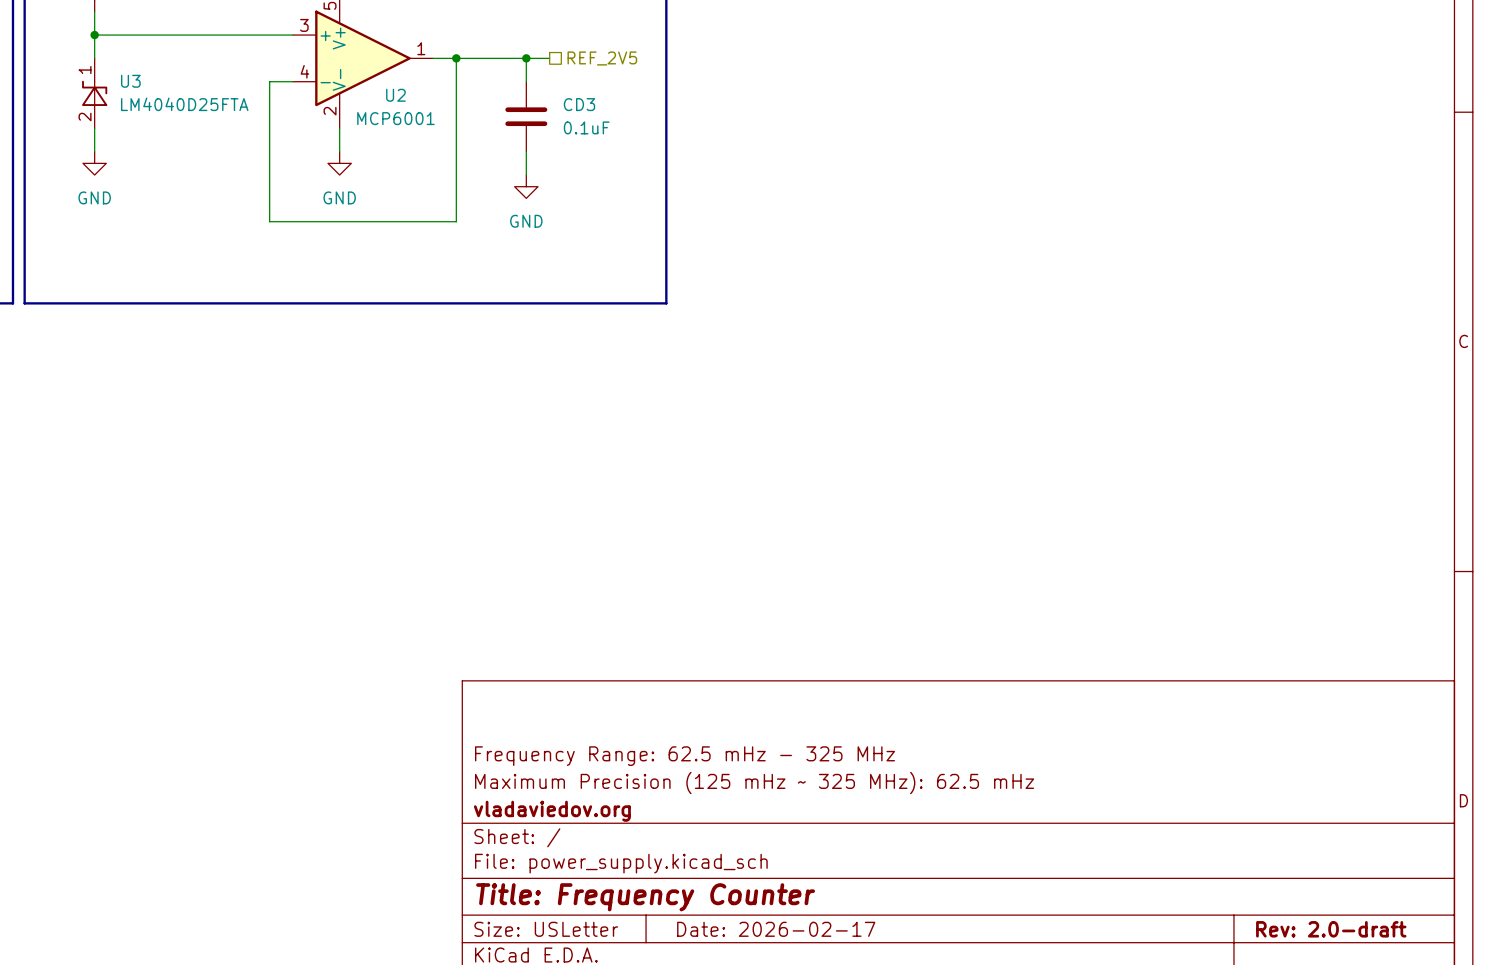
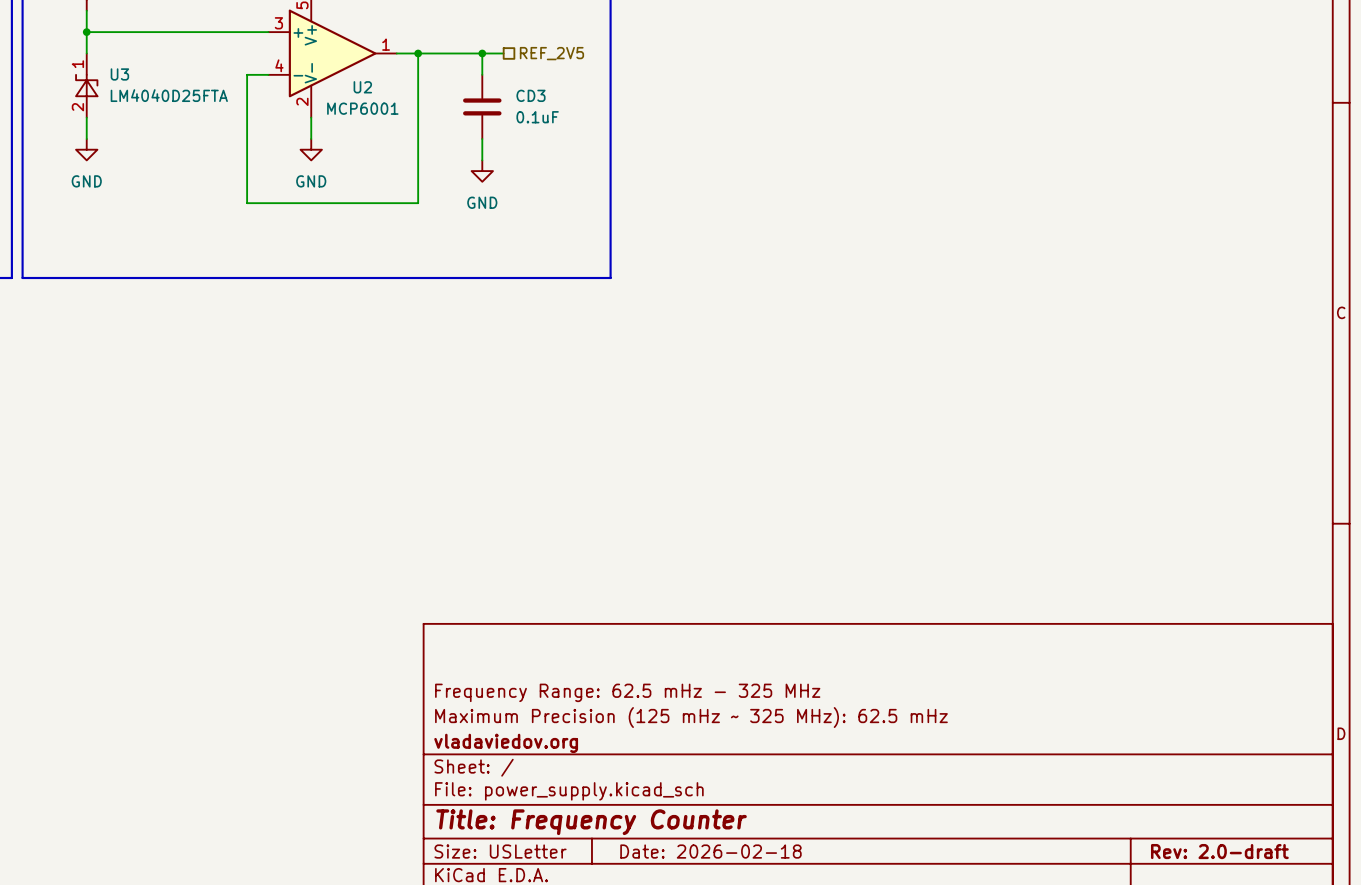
title block: Date: 2026-02-17 (776, 929) -> Date: 2026-02-18 (710, 851)

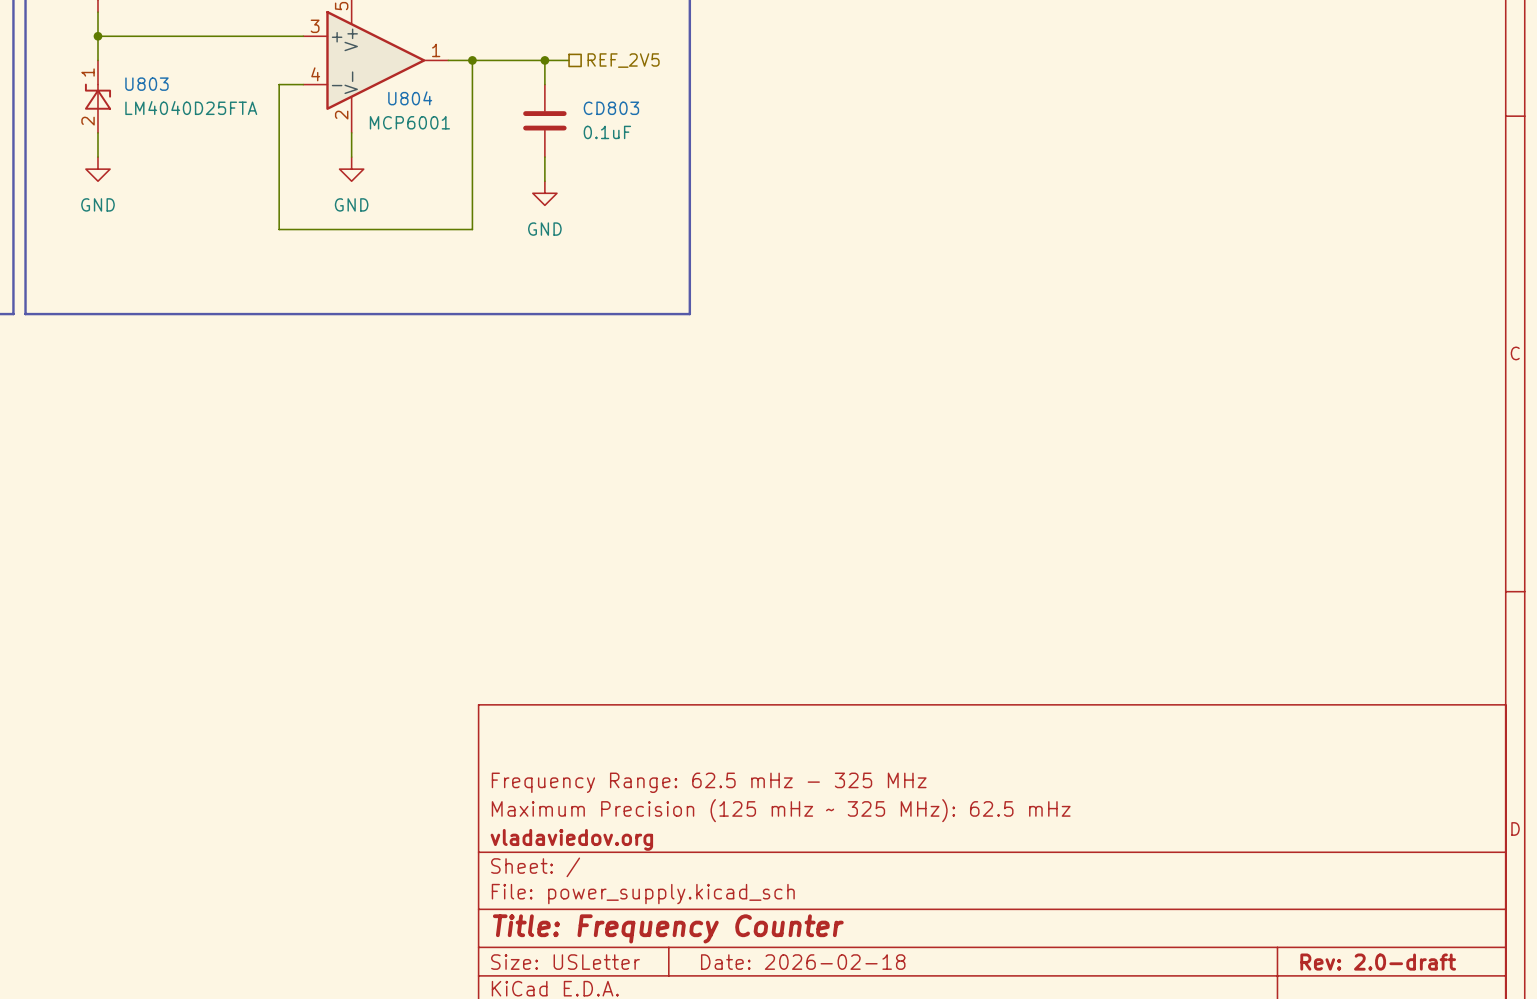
U3 name: U3 (119, 74) -> U803 (146, 84)
U2 name: U2 (362, 87) -> U804 (410, 98)
CD3 name: CD3 (530, 95) -> CD803 (611, 108)

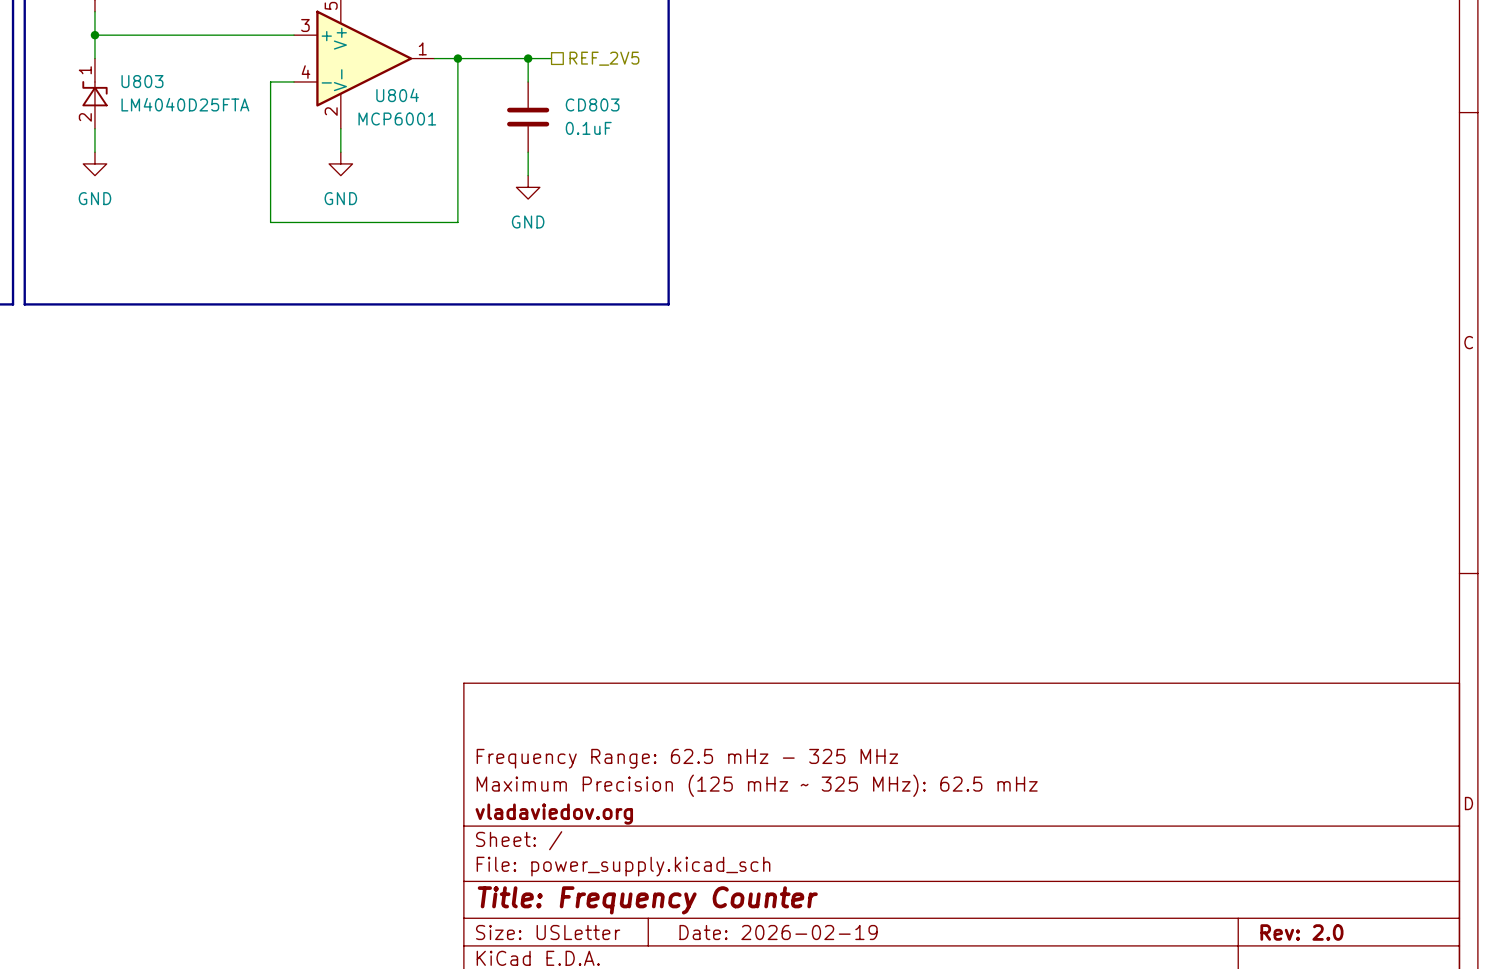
title block: Date: 2026-02-18 (803, 962) -> Date: 2026-02-19 (778, 932)
title block: Rev: 2.0-draft (1378, 962) -> Rev: 2.0 (1301, 932)

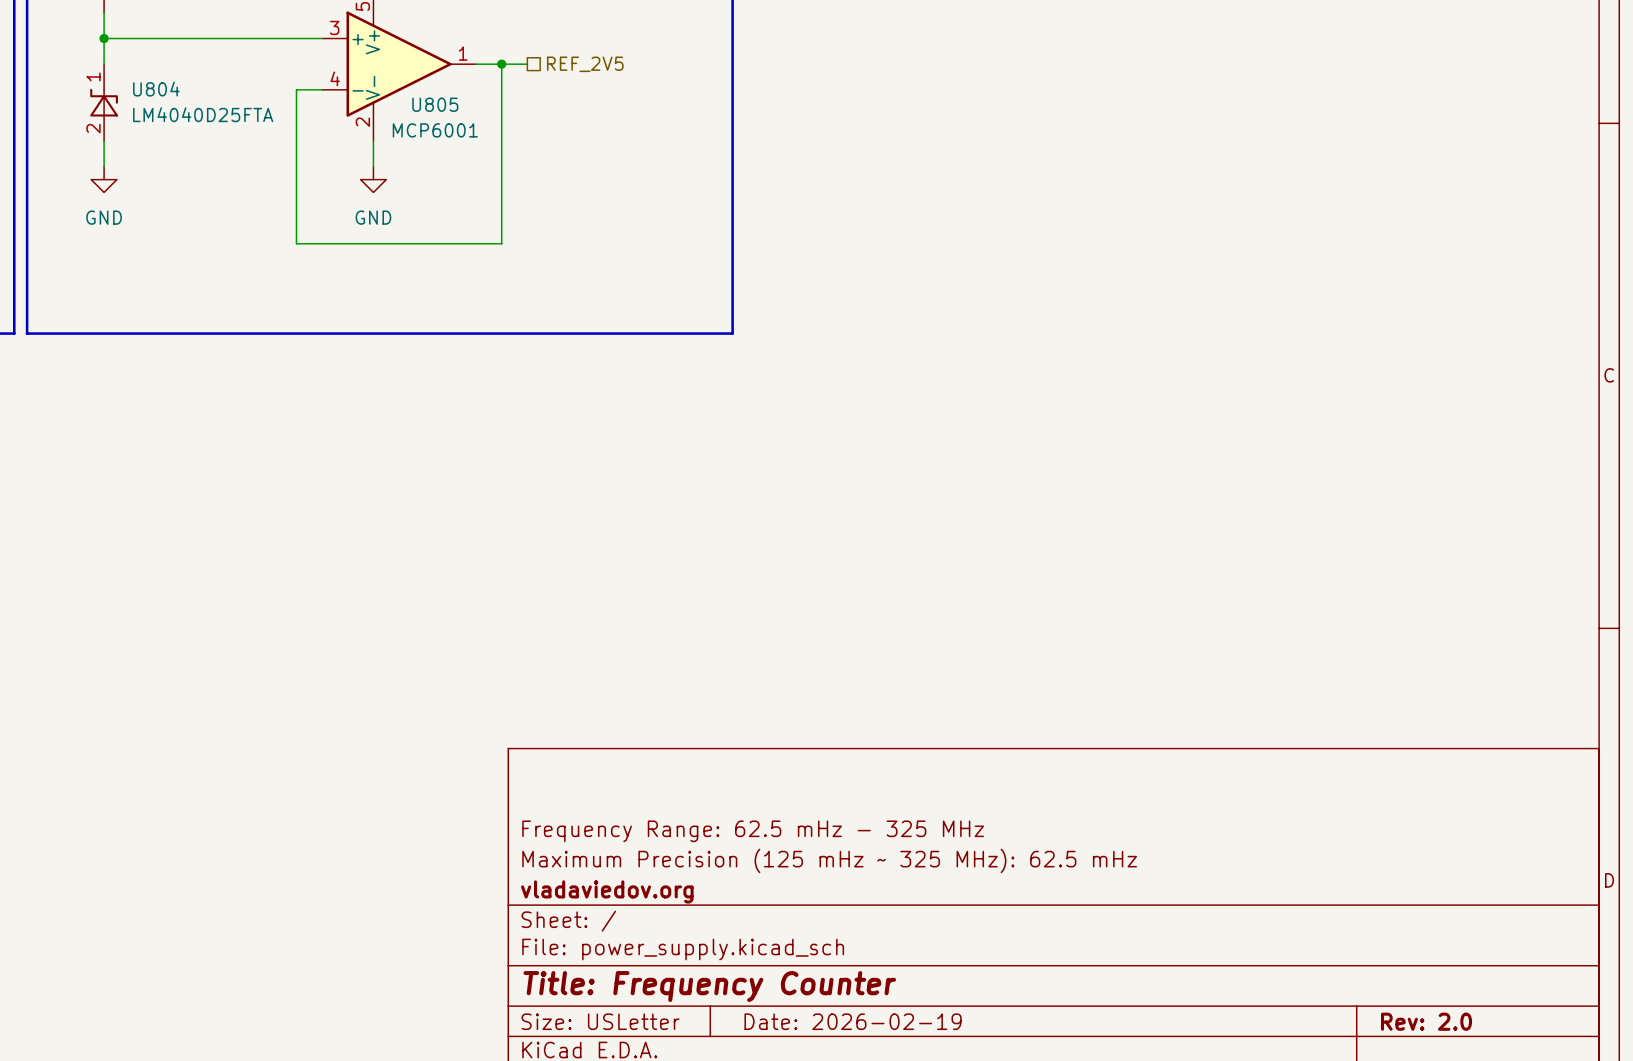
wire: (481, 58) (551, 58) -> none
wire: (528, 58) (528, 81) -> none
junction: (528, 58) -> none
hierarchical label position: REF_2V5 (604, 58) -> REF_2V5 (585, 64)
U803 name: U803 (142, 81) -> U804 (156, 89)
U804 name: U804 (397, 95) -> U805 (435, 104)
CD803: 0.1uF (528, 117) -> none
wire: (528, 152) (528, 175) -> none
power symbol: GND (528, 187) -> none

